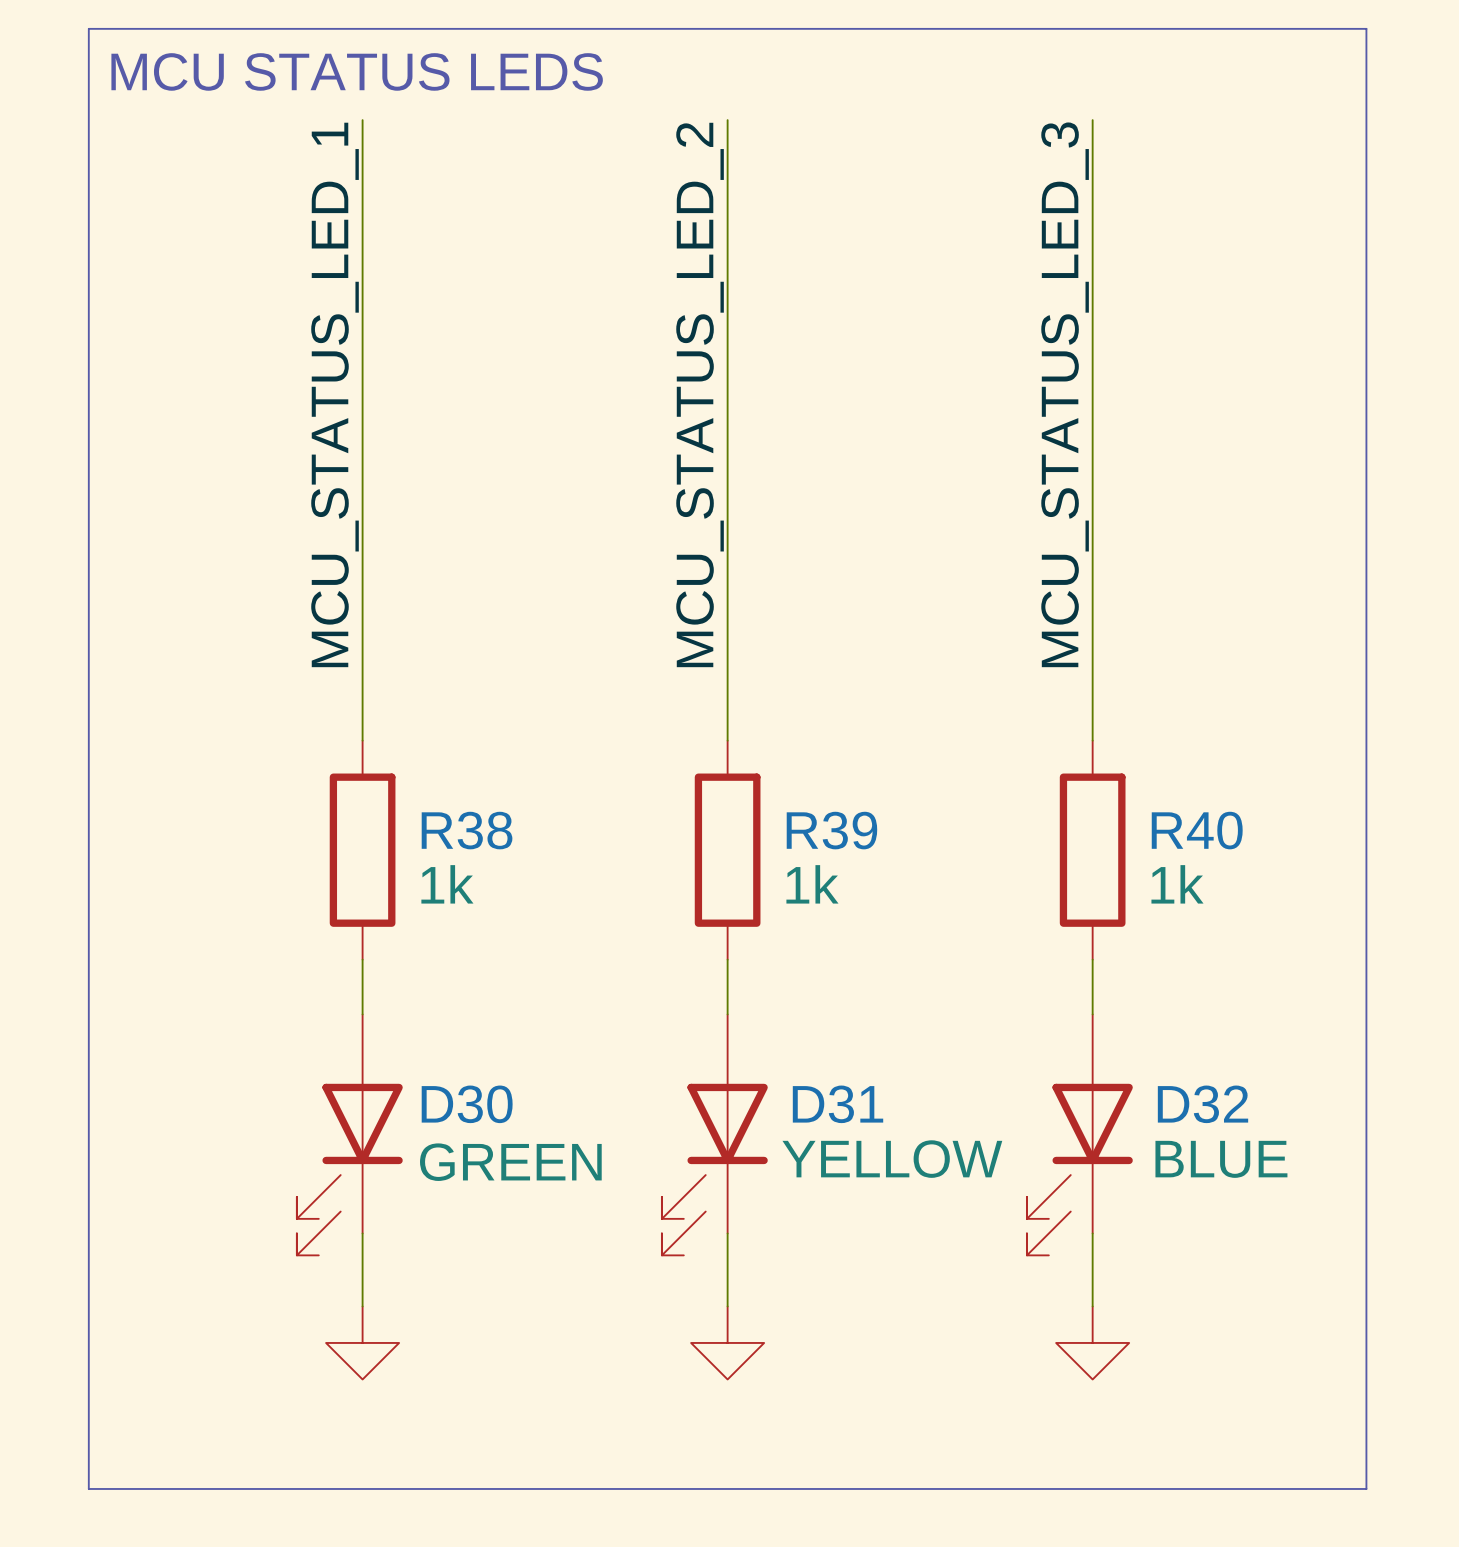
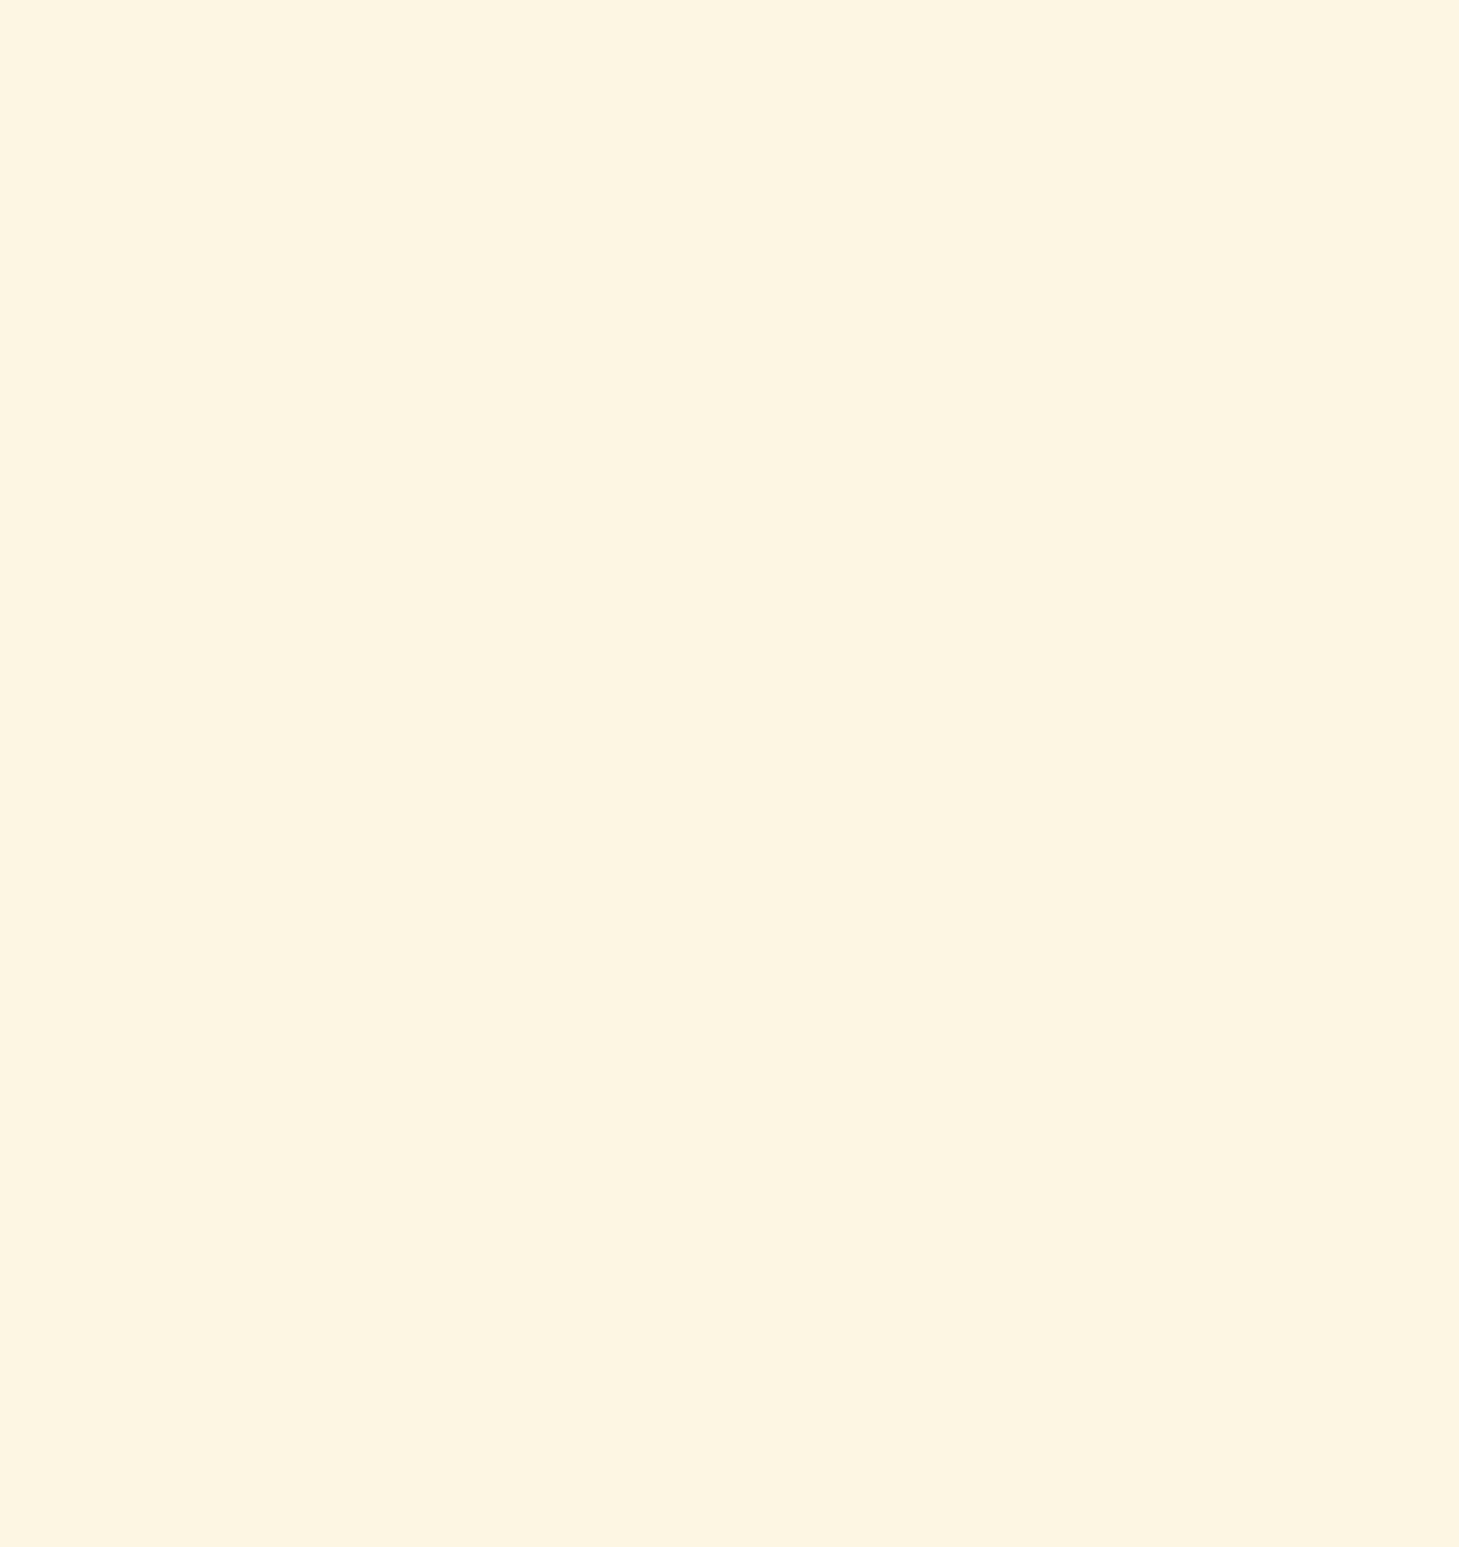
line: (88, 28) (88, 1488) (1366, 1488) (1366, 28) (88, 28) -> none
text: MCU STATUS LEDS (357, 71) -> none
wire: (362, 120) (362, 740) -> none
wire: (727, 120) (727, 740) -> none
wire: (1092, 120) (1092, 740) -> none
label: MCU_STATUS_LED_1 (335, 394) -> none
label: MCU_STATUS_LED_2 (700, 394) -> none
label: MCU_STATUS_LED_3 (1065, 394) -> none
R38: 1k (362, 850) -> none
R39: 1k (727, 850) -> none
R40: 1k (1092, 850) -> none
wire: (362, 959) (362, 1014) -> none
wire: (727, 959) (727, 1014) -> none
wire: (1092, 959) (1092, 1014) -> none
D30: GREEN (349, 1134) -> none
D31: YELLOW (714, 1134) -> none
D32: BLUE (1079, 1134) -> none
wire: (362, 1233) (362, 1306) -> none
wire: (727, 1233) (727, 1306) -> none
wire: (1092, 1233) (1092, 1306) -> none
power symbol: (362, 1342) -> none
power symbol: (727, 1342) -> none
power symbol: (1092, 1342) -> none

